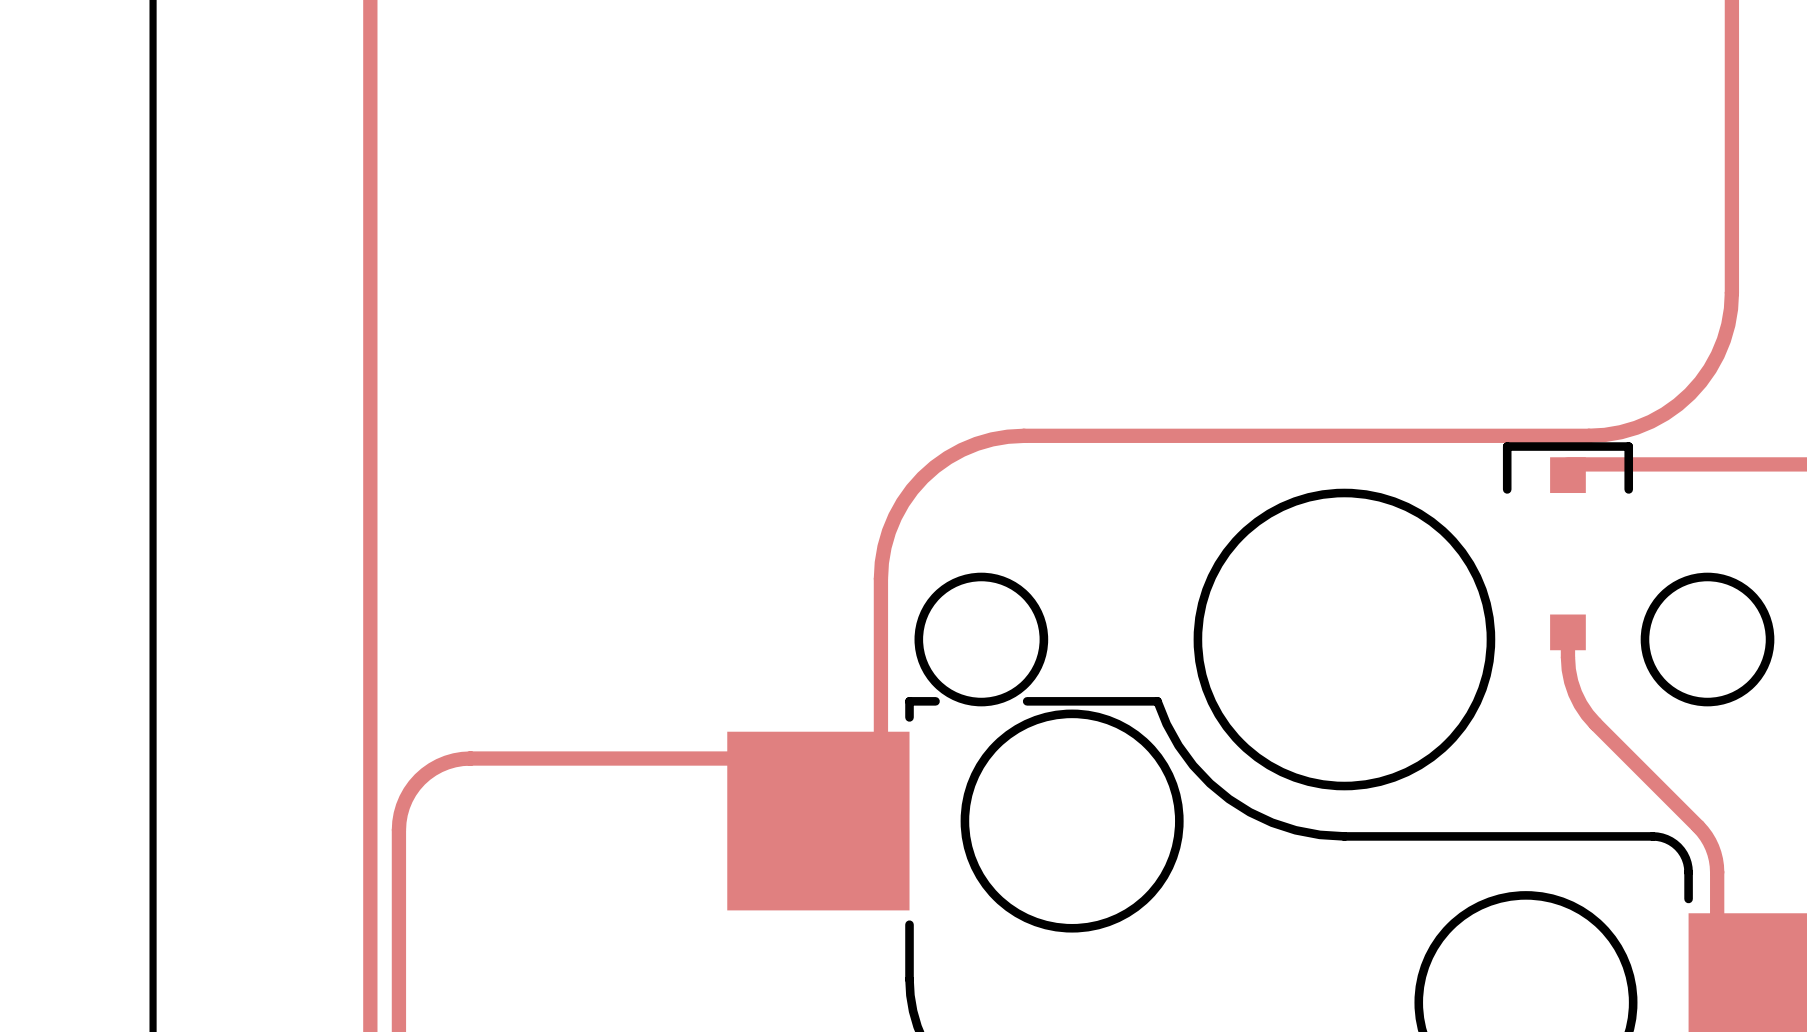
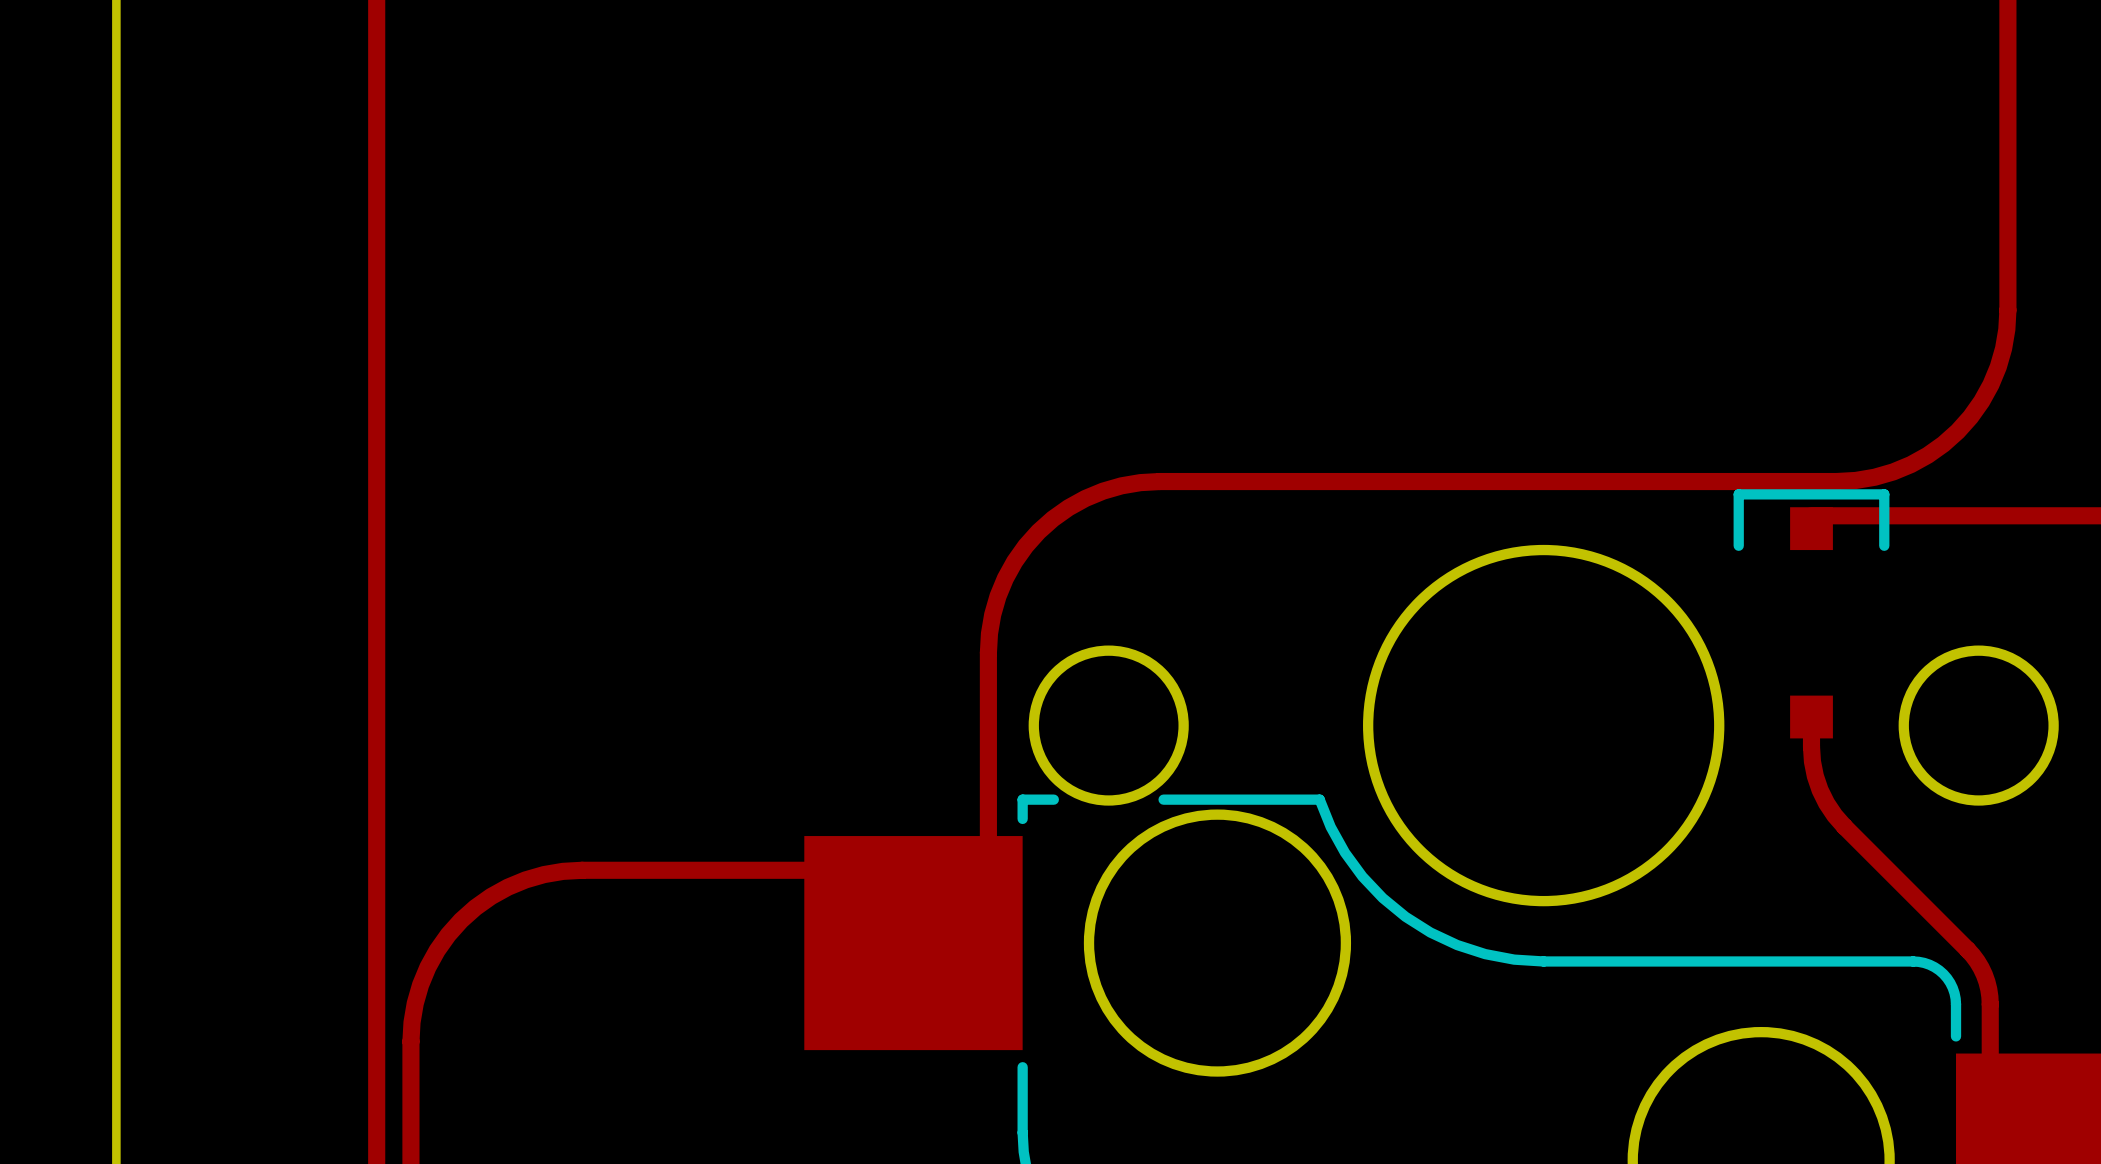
track: (818, 758) (470, 758) (446, 762) (432, 769) (419, 779) (409, 791) (402, 806) (398, 829) (398, 903) -> (913, 870) (582, 870) (544, 874) (525, 879) (507, 887) (475, 907) (448, 934) (427, 967) (420, 984) (415, 1003) (410, 1041)

